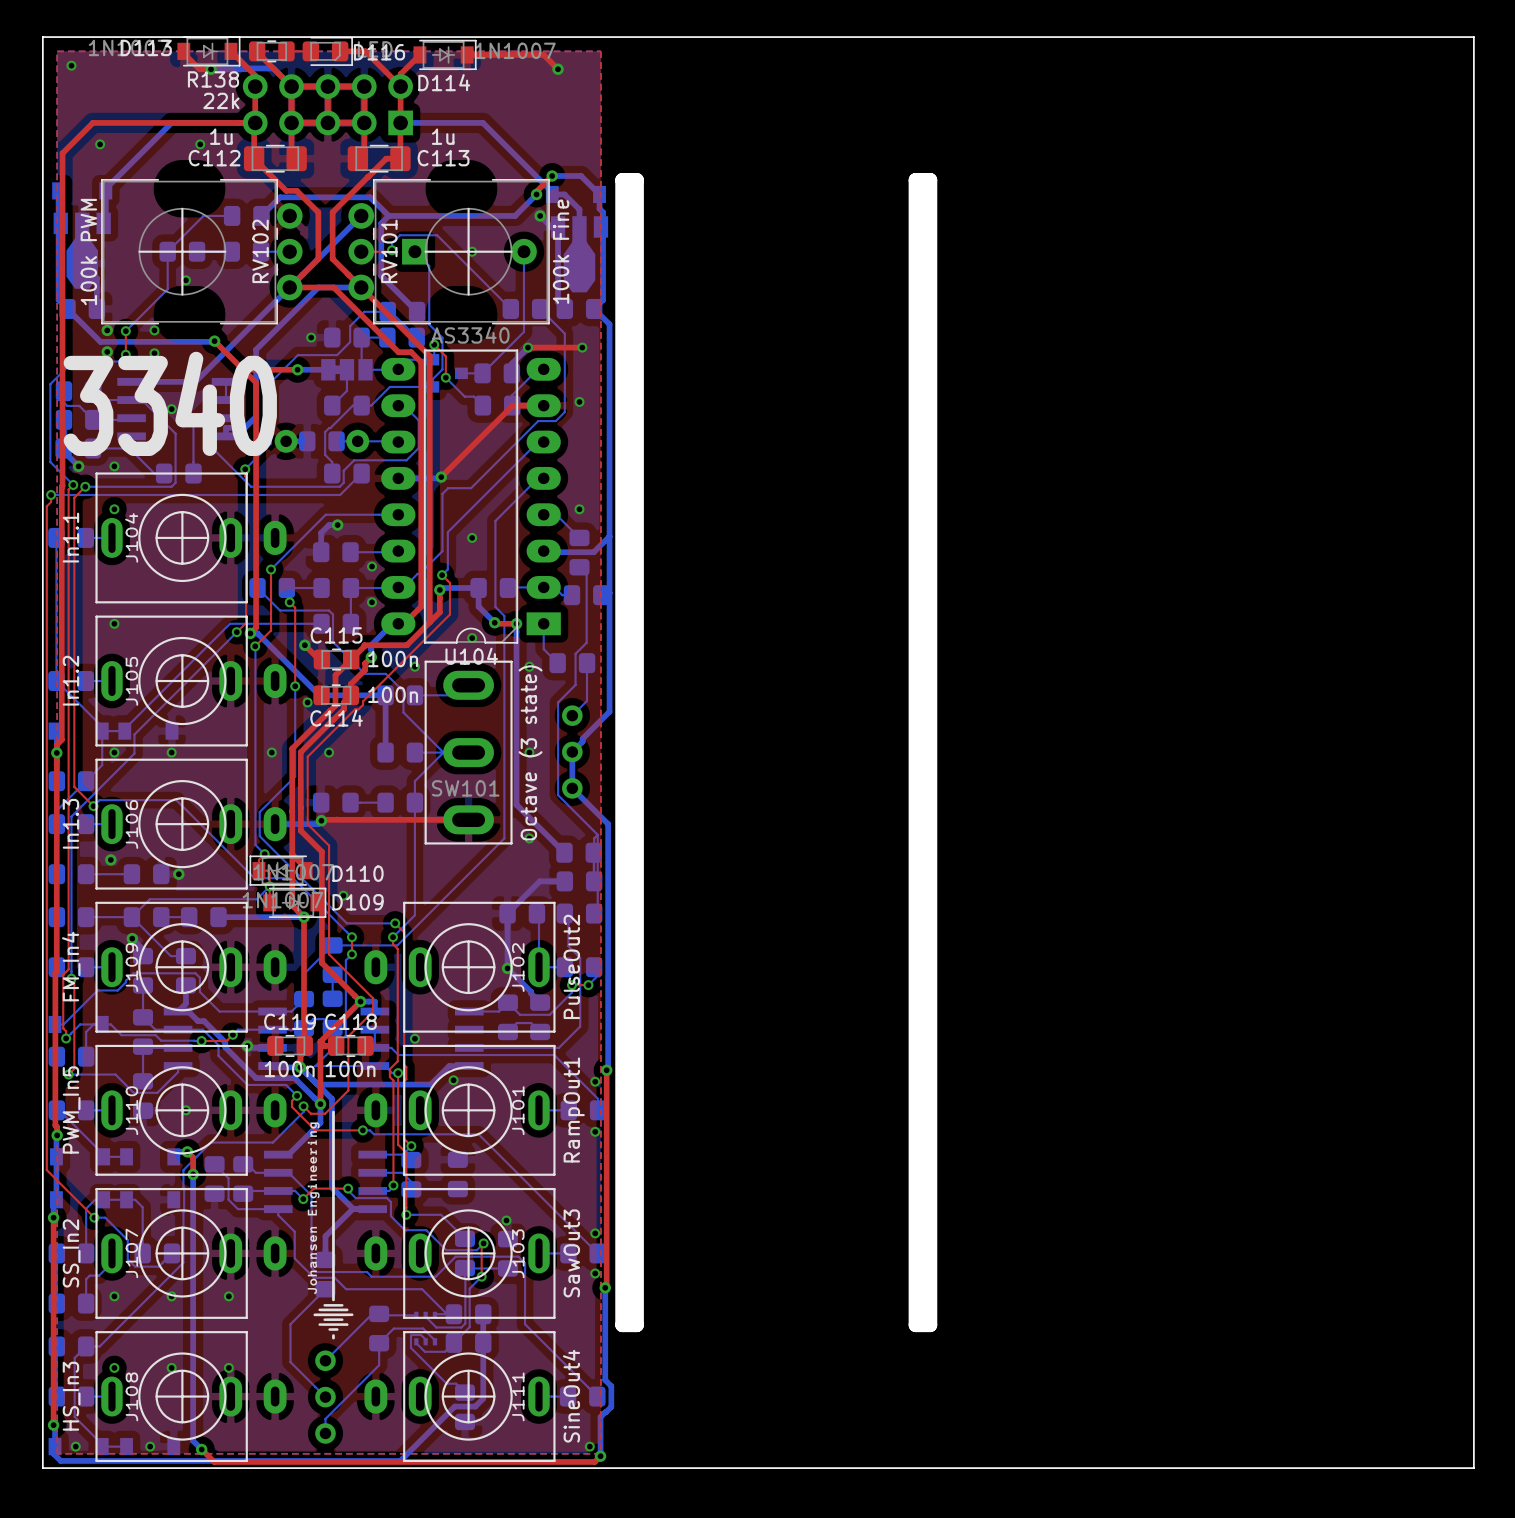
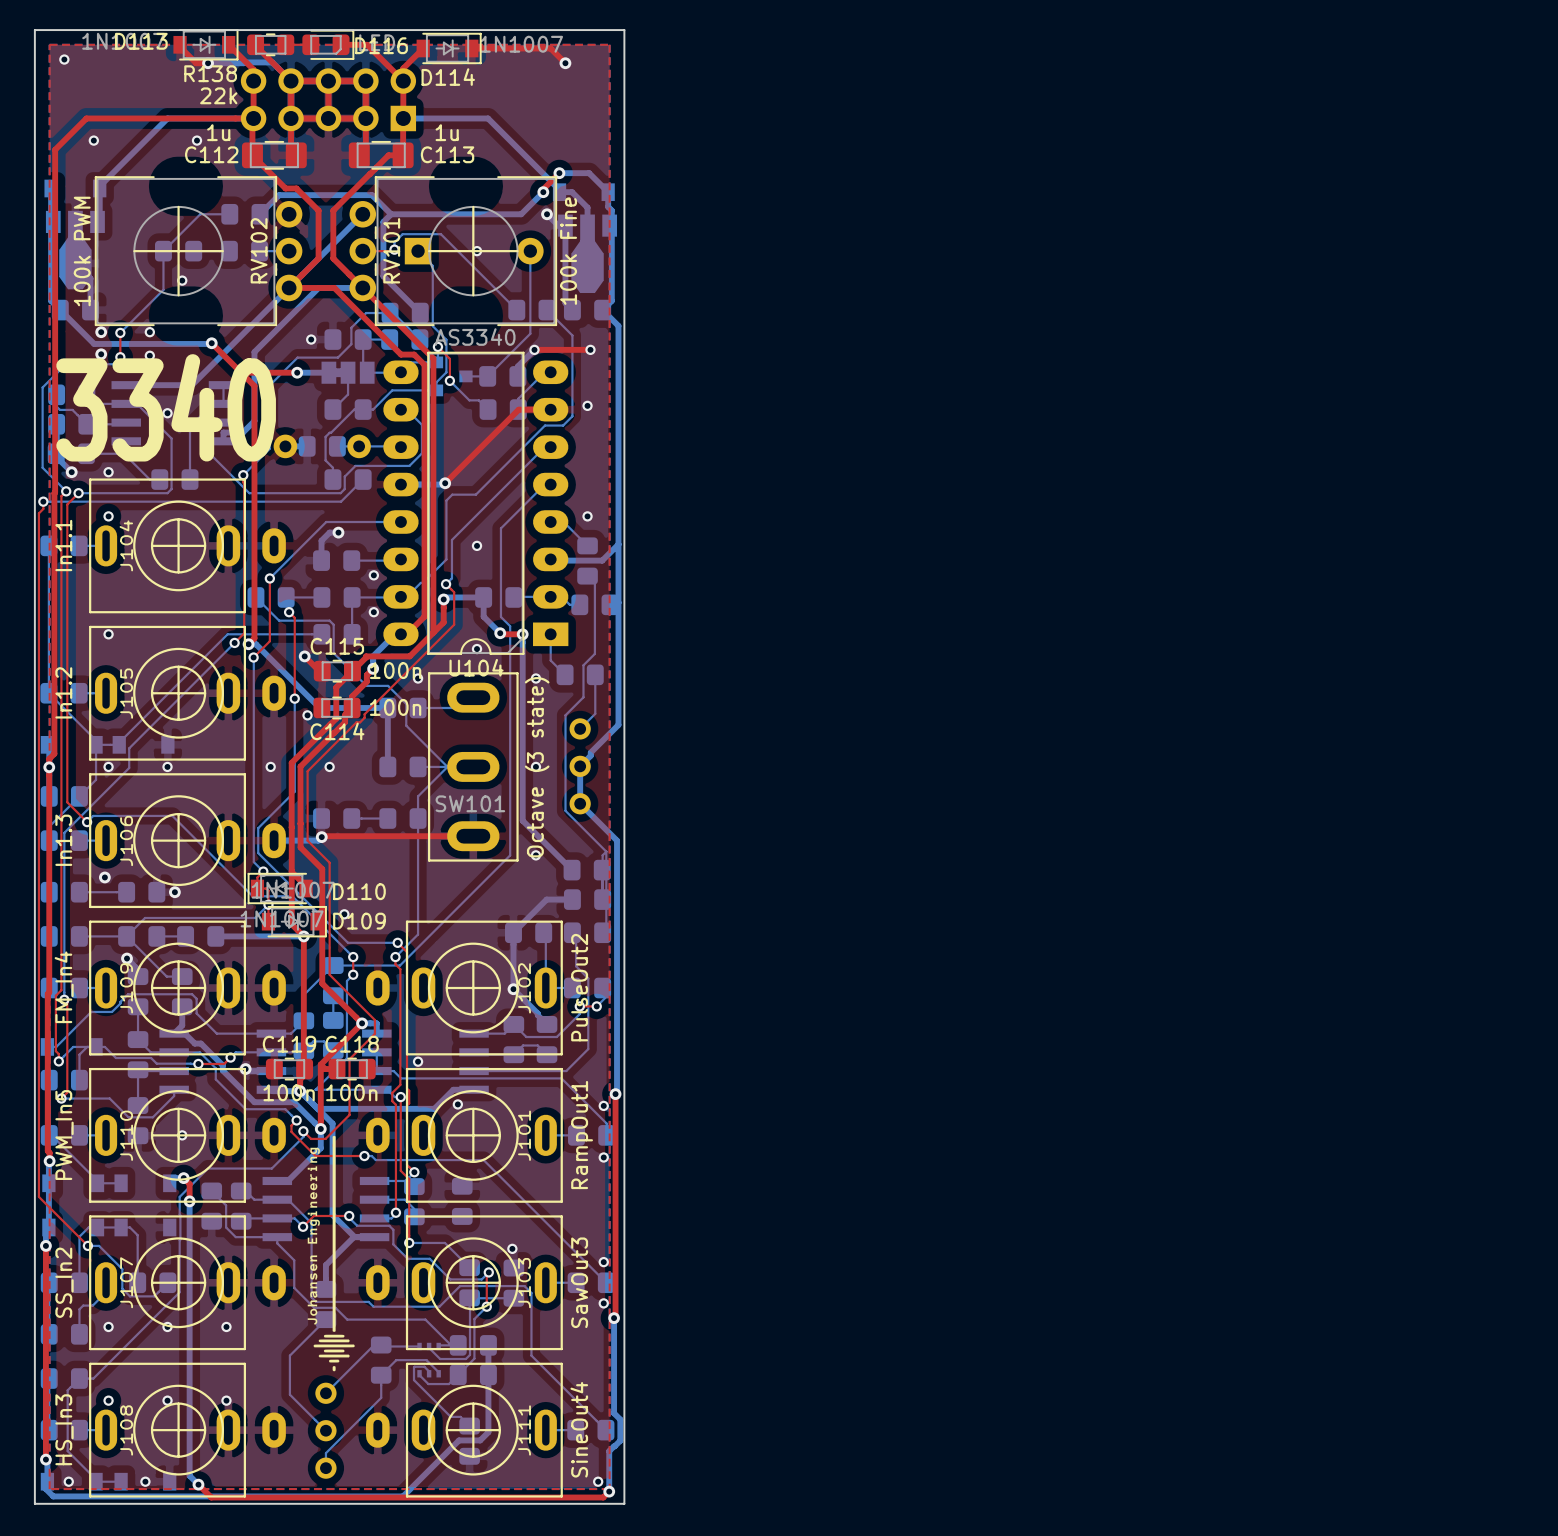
board edge: (615, 37) (1473, 37) (1473, 1468) (615, 1468) -> (624, 30) (624, 1503)
board edge: (622, 180) (636, 180) (636, 1324) (622, 1324) (622, 180) -> none
board edge: (915, 180) (915, 1324) (930, 1324) (930, 180) (915, 180) -> none

